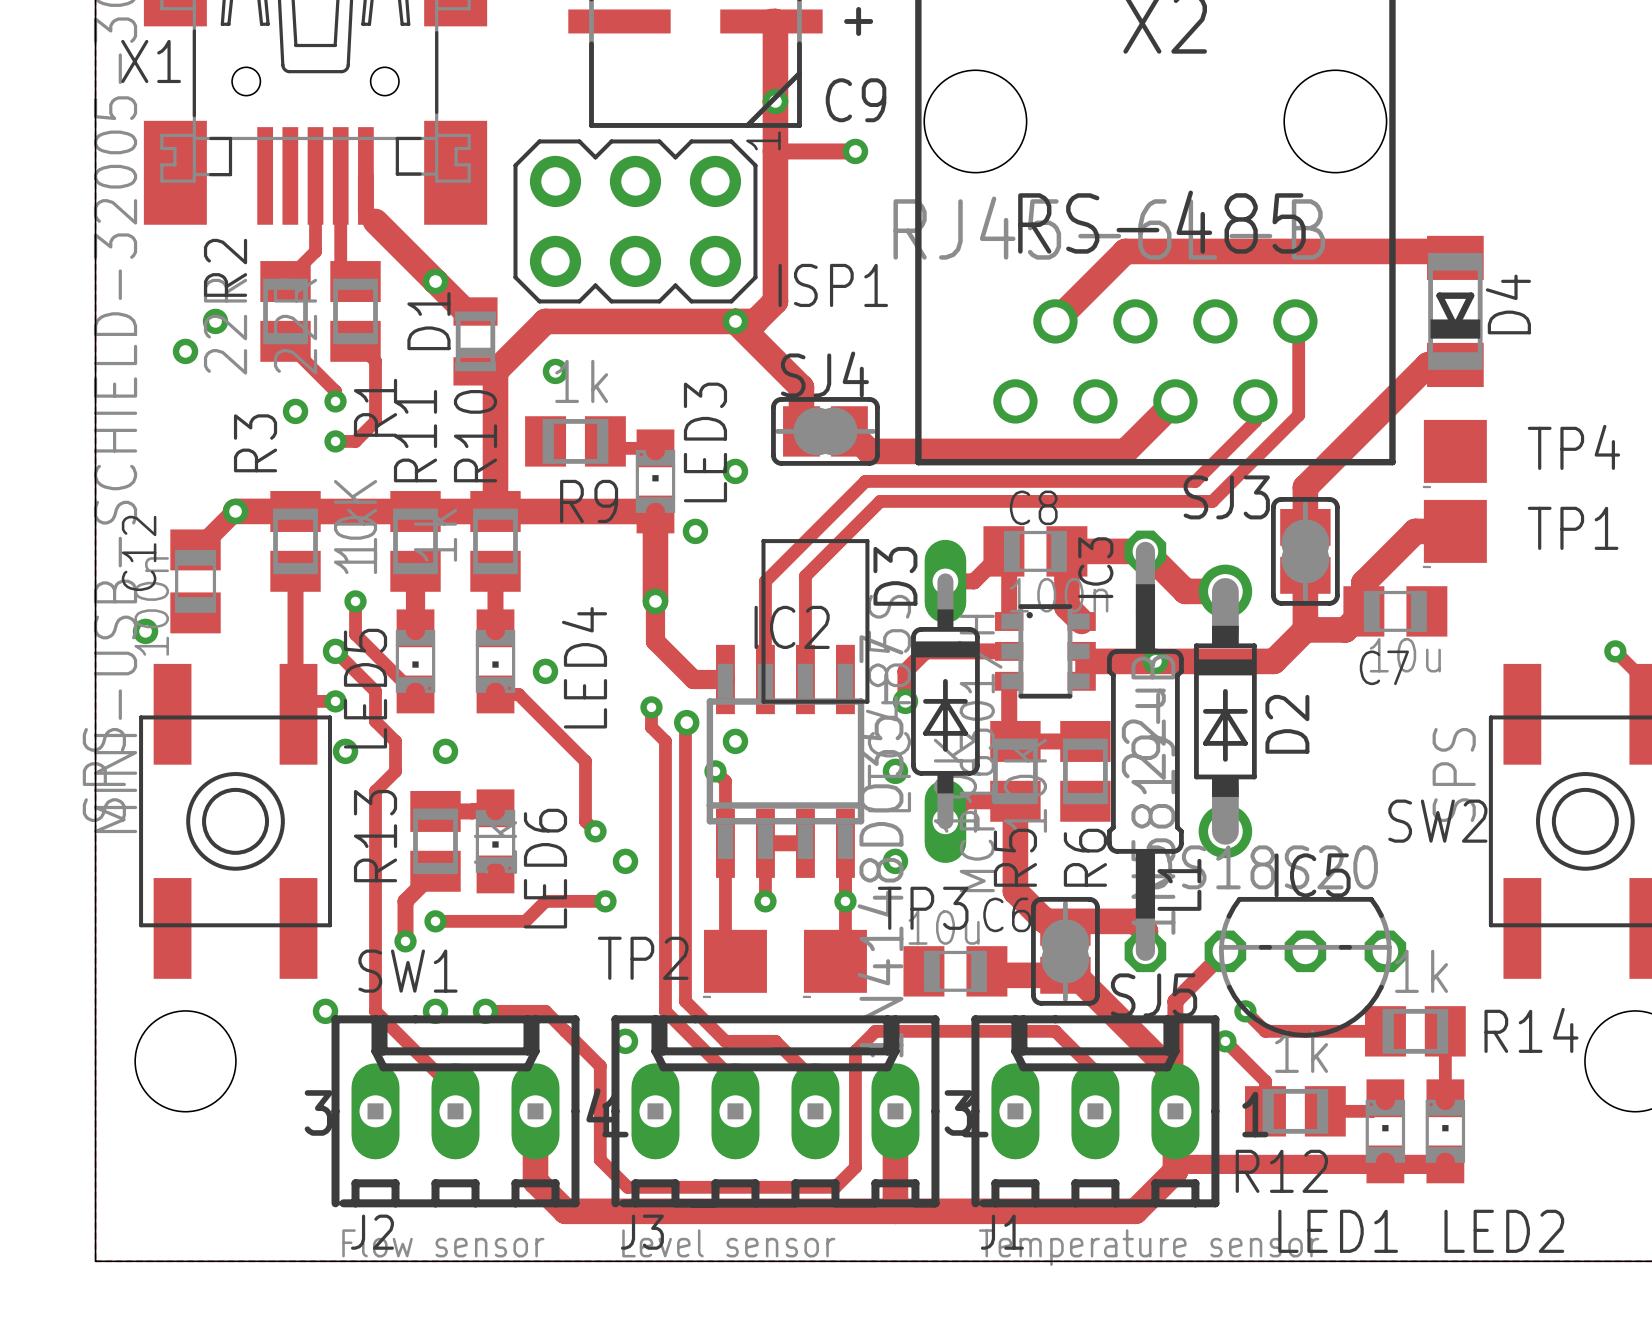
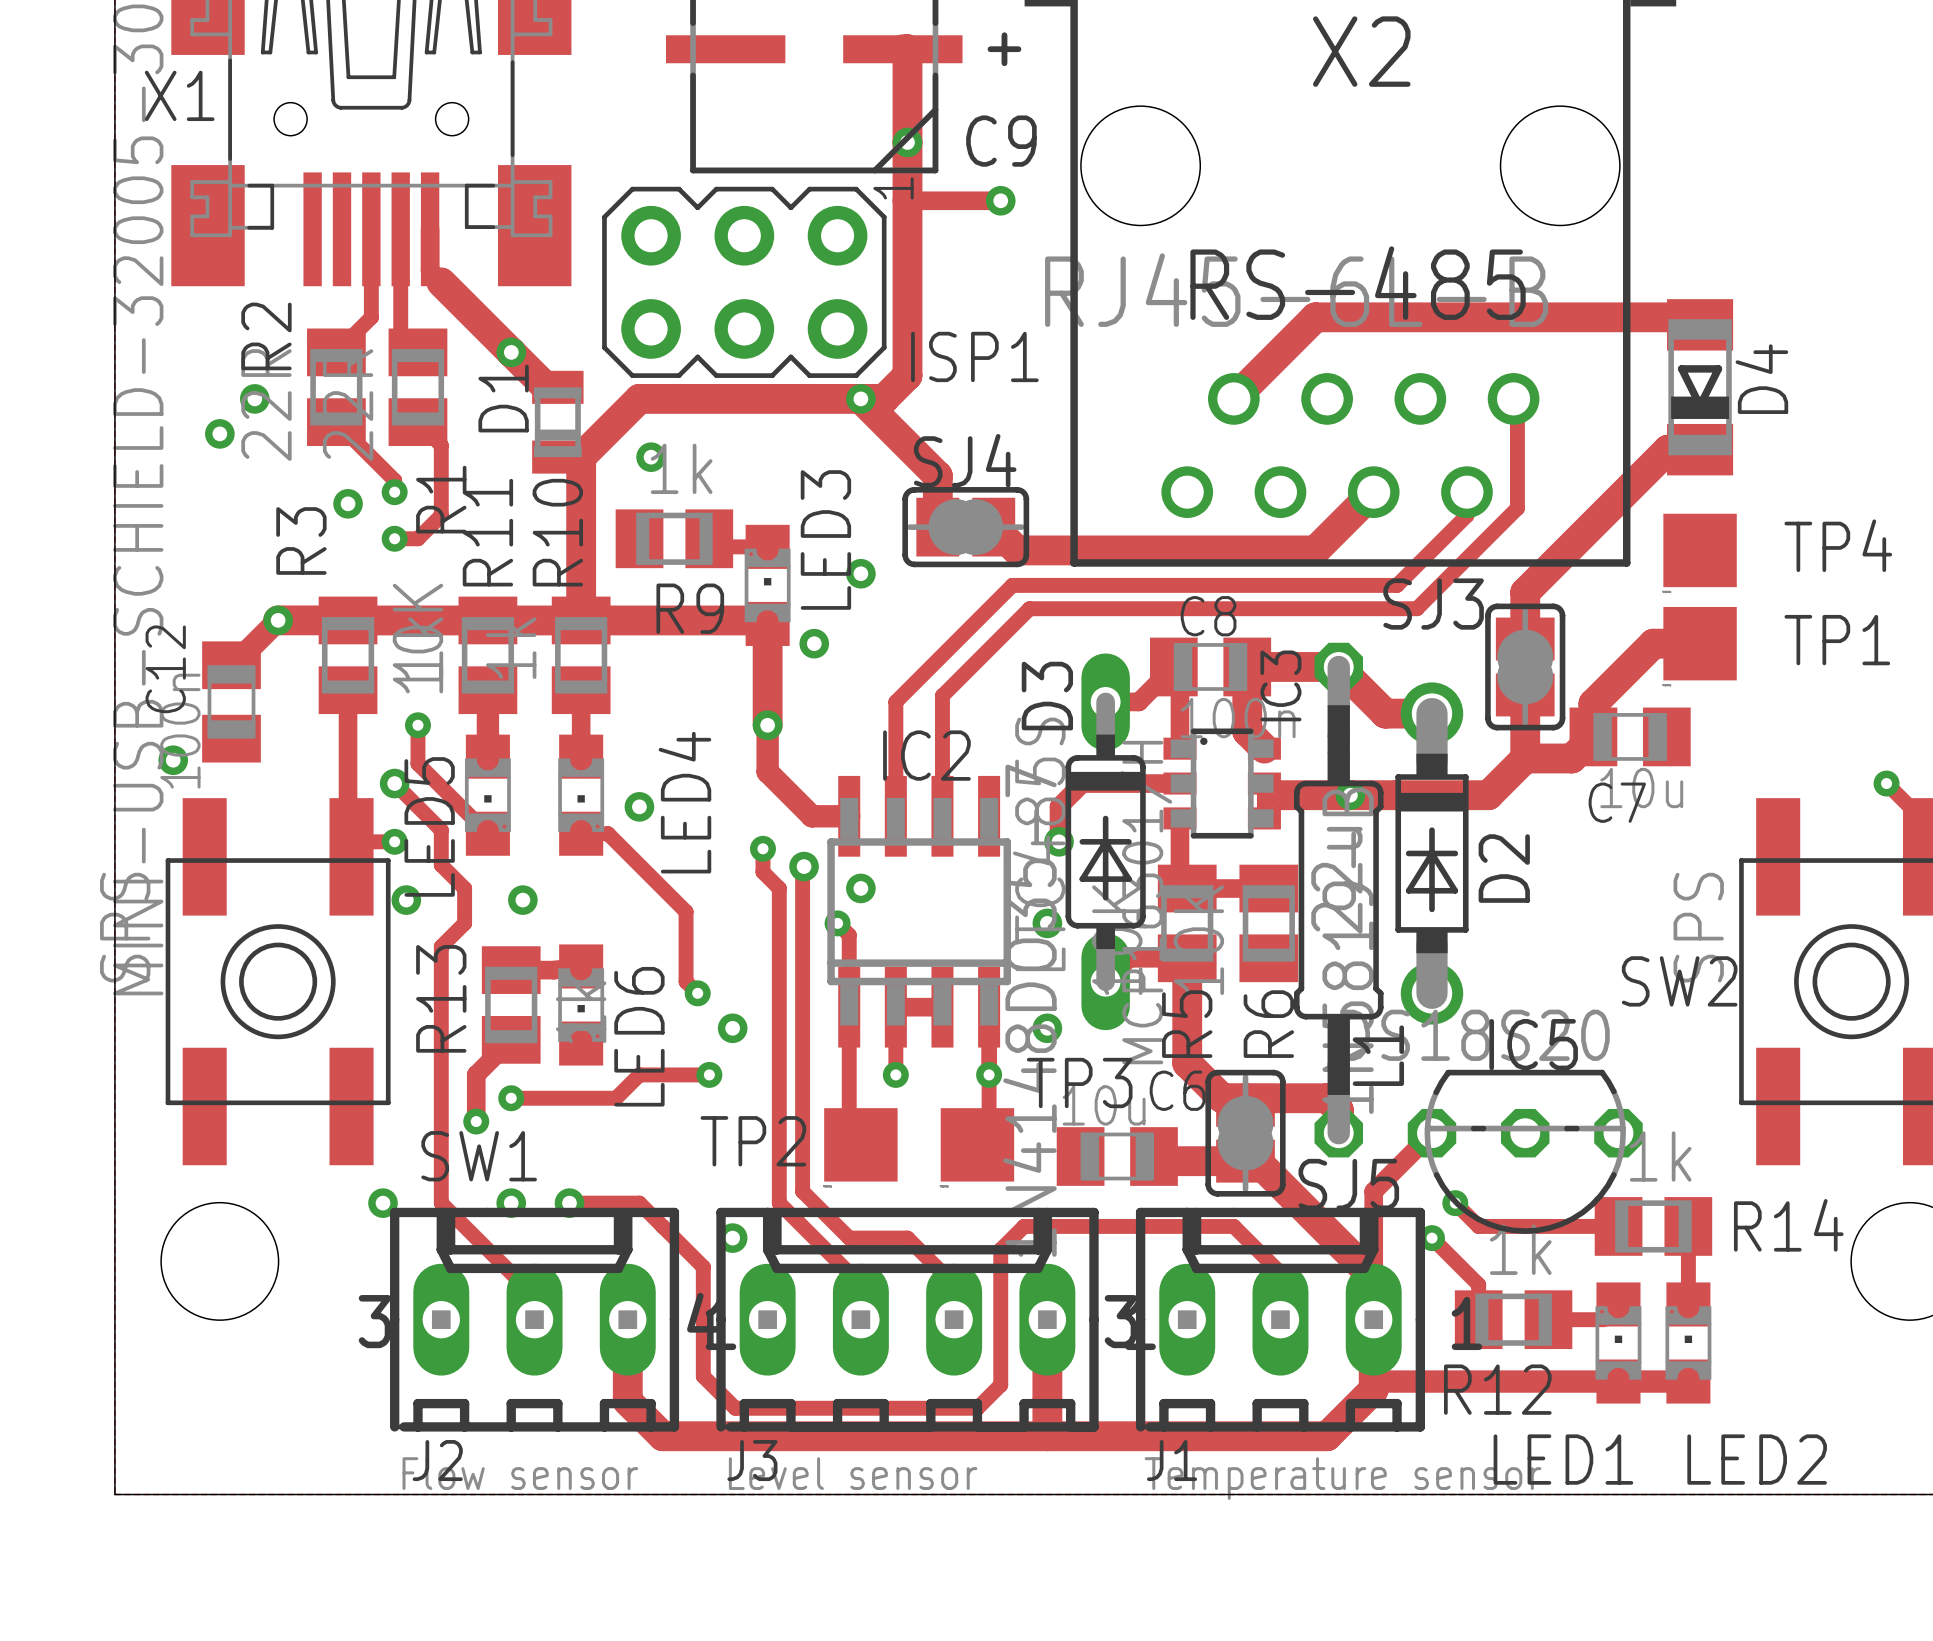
part: (815, 621) -> none

